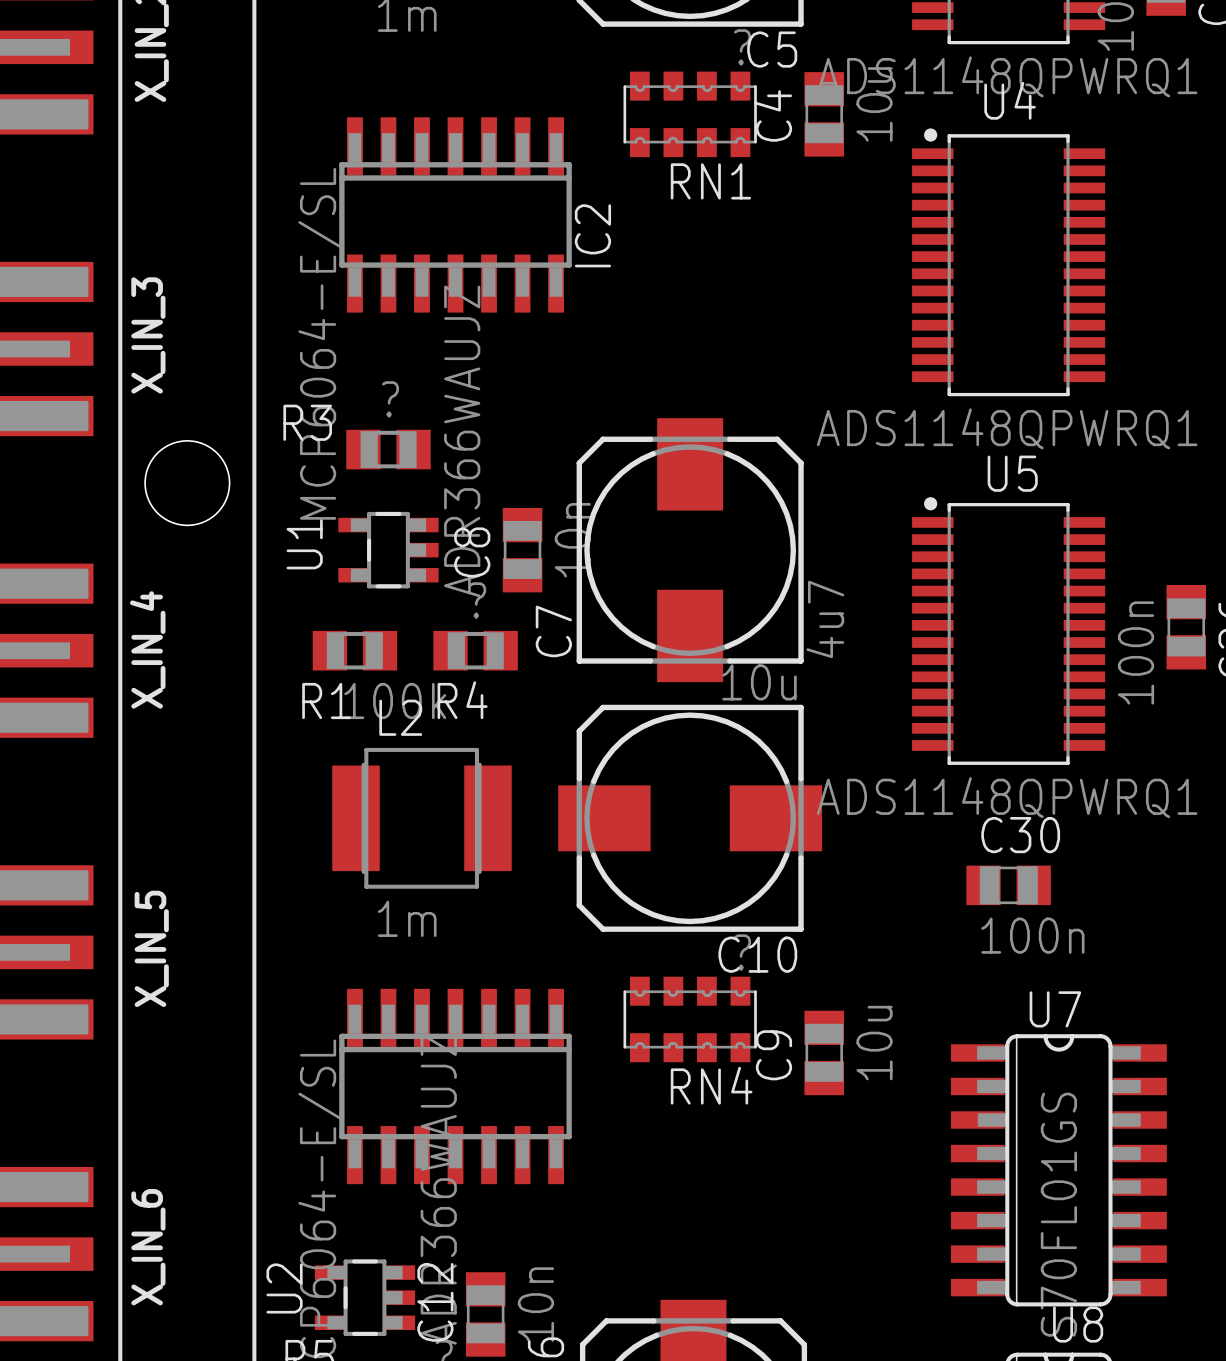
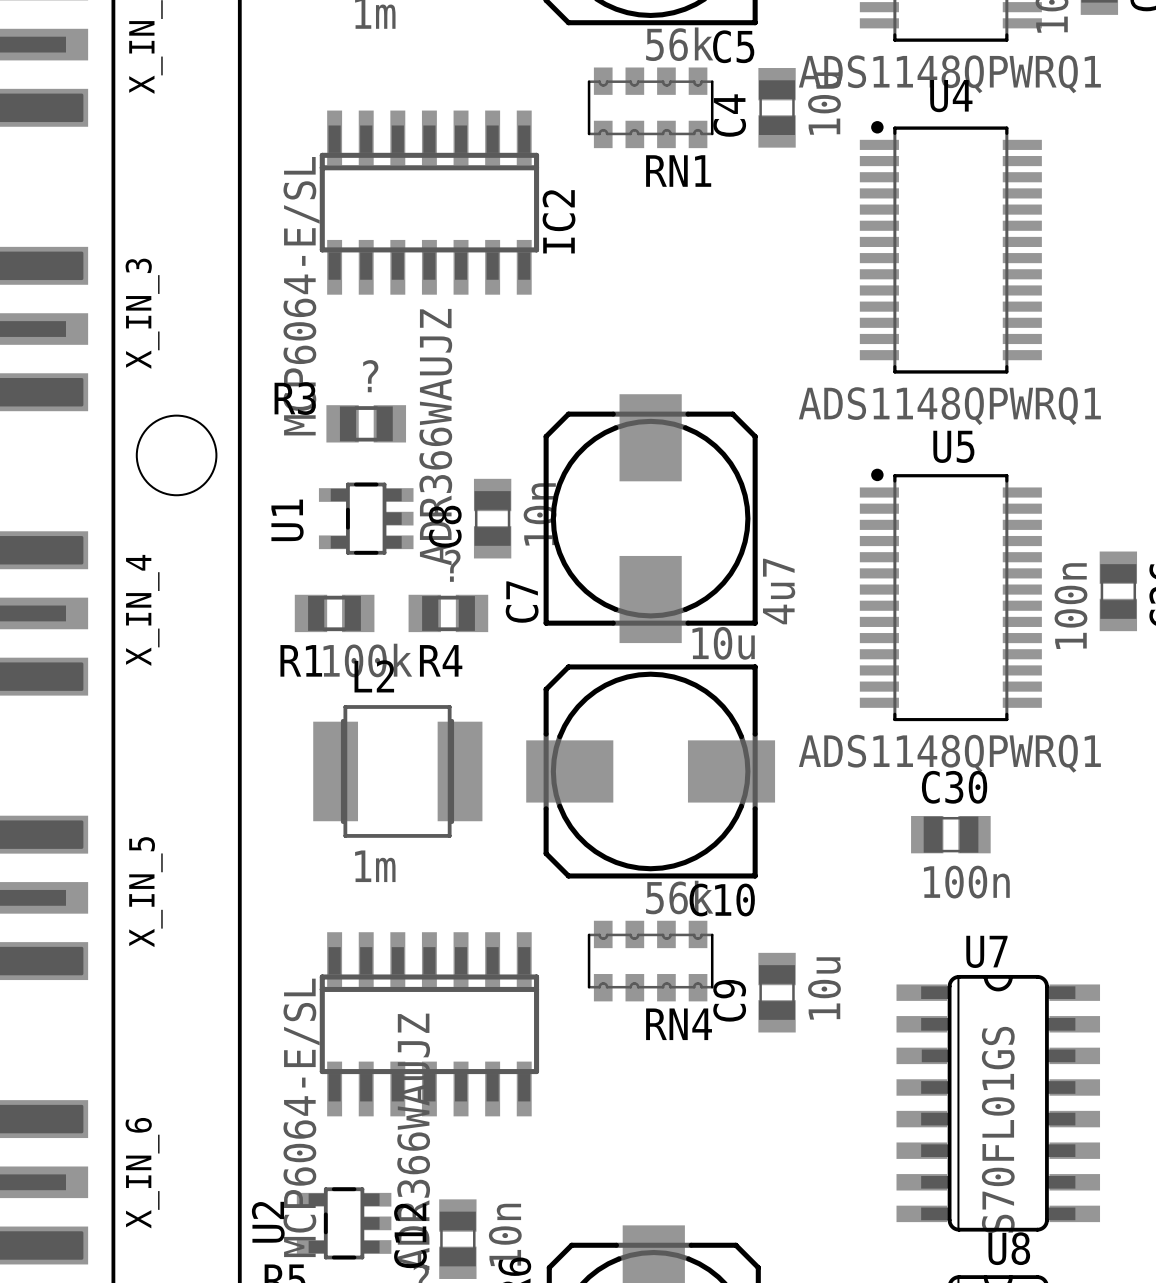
RN1 value: ? (742, 47) -> 56k (679, 44)
RN4 value: ? (742, 952) -> 56k (679, 897)

